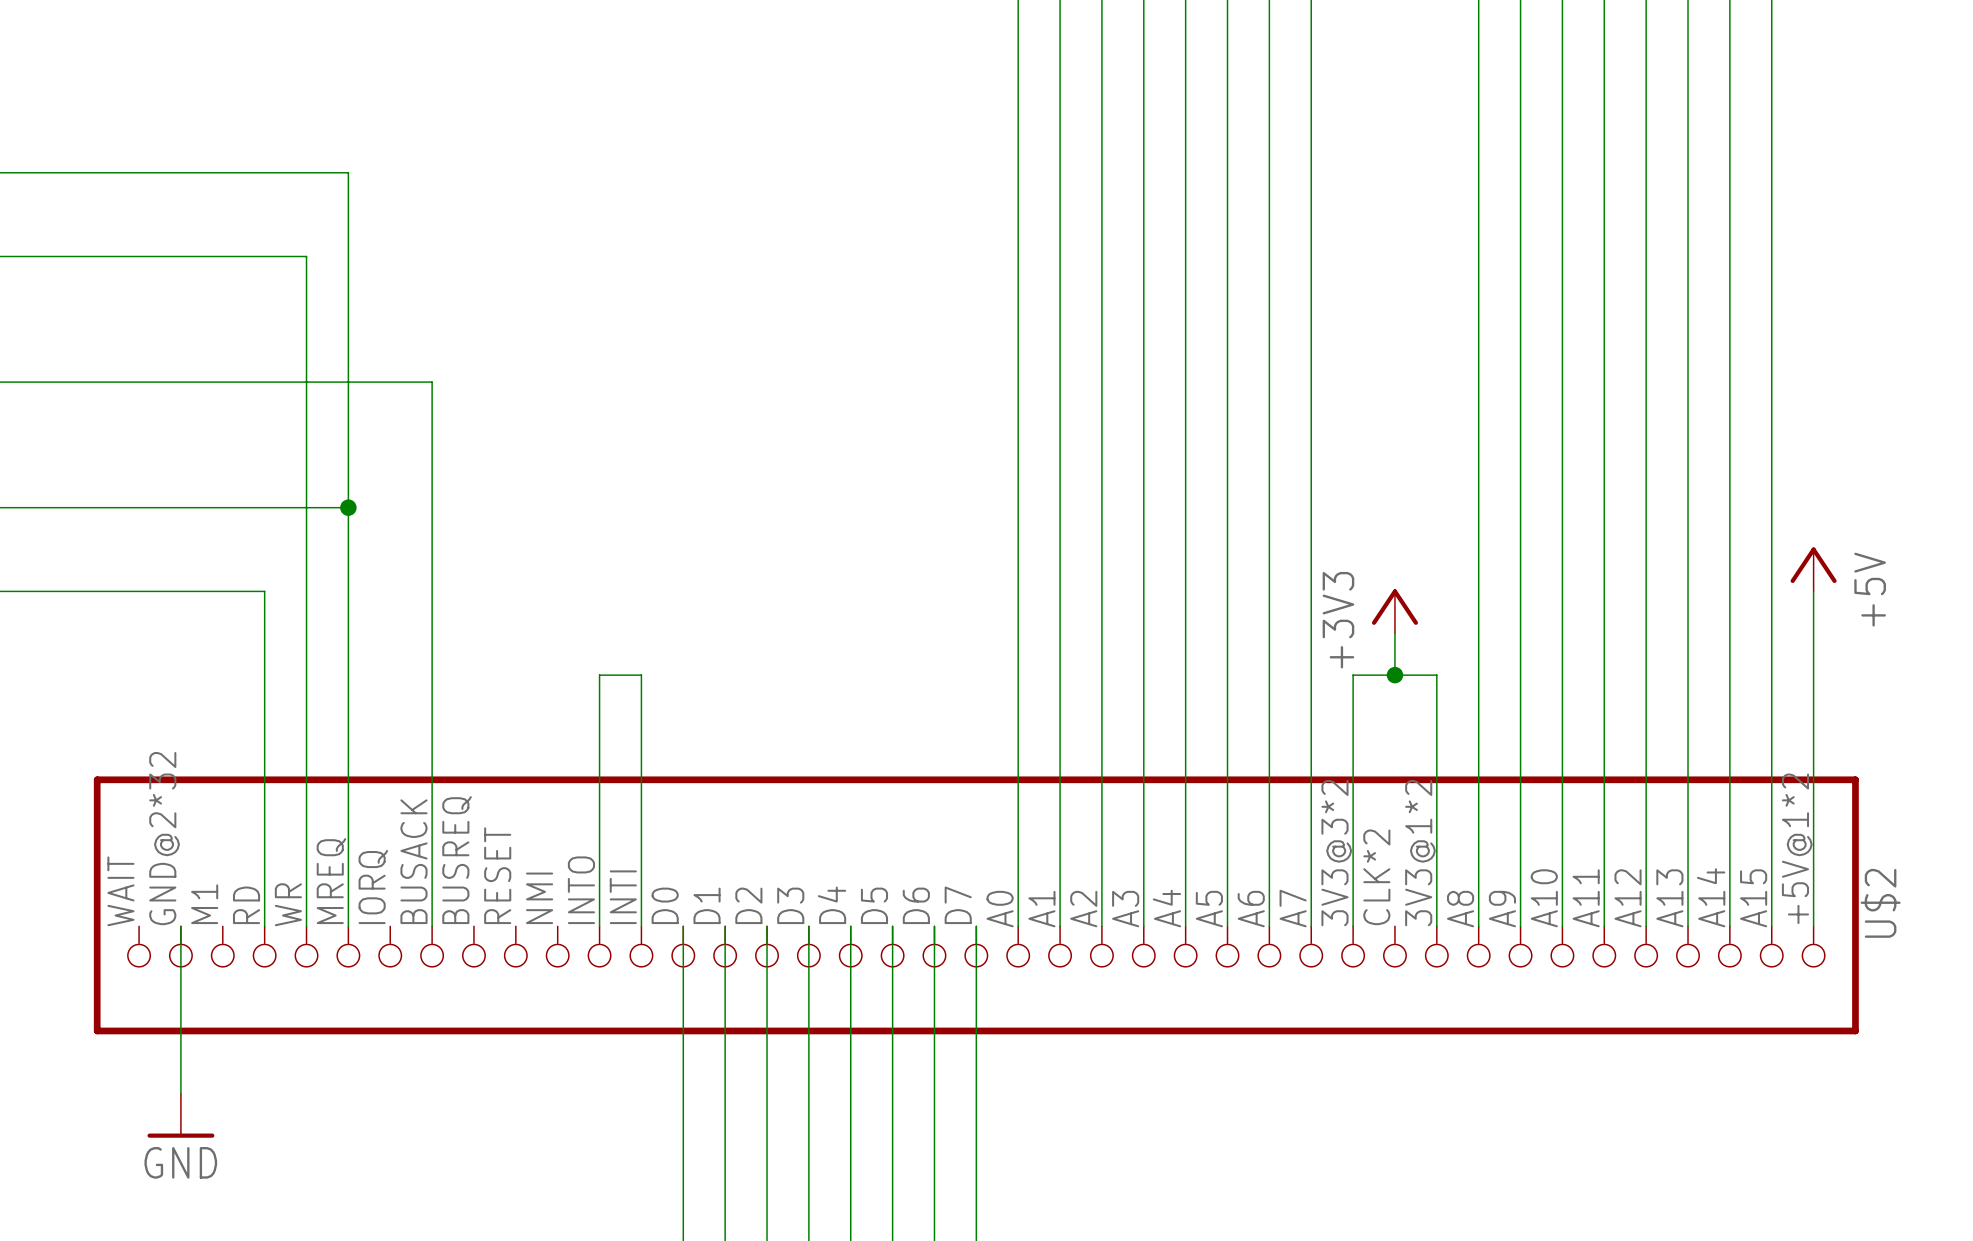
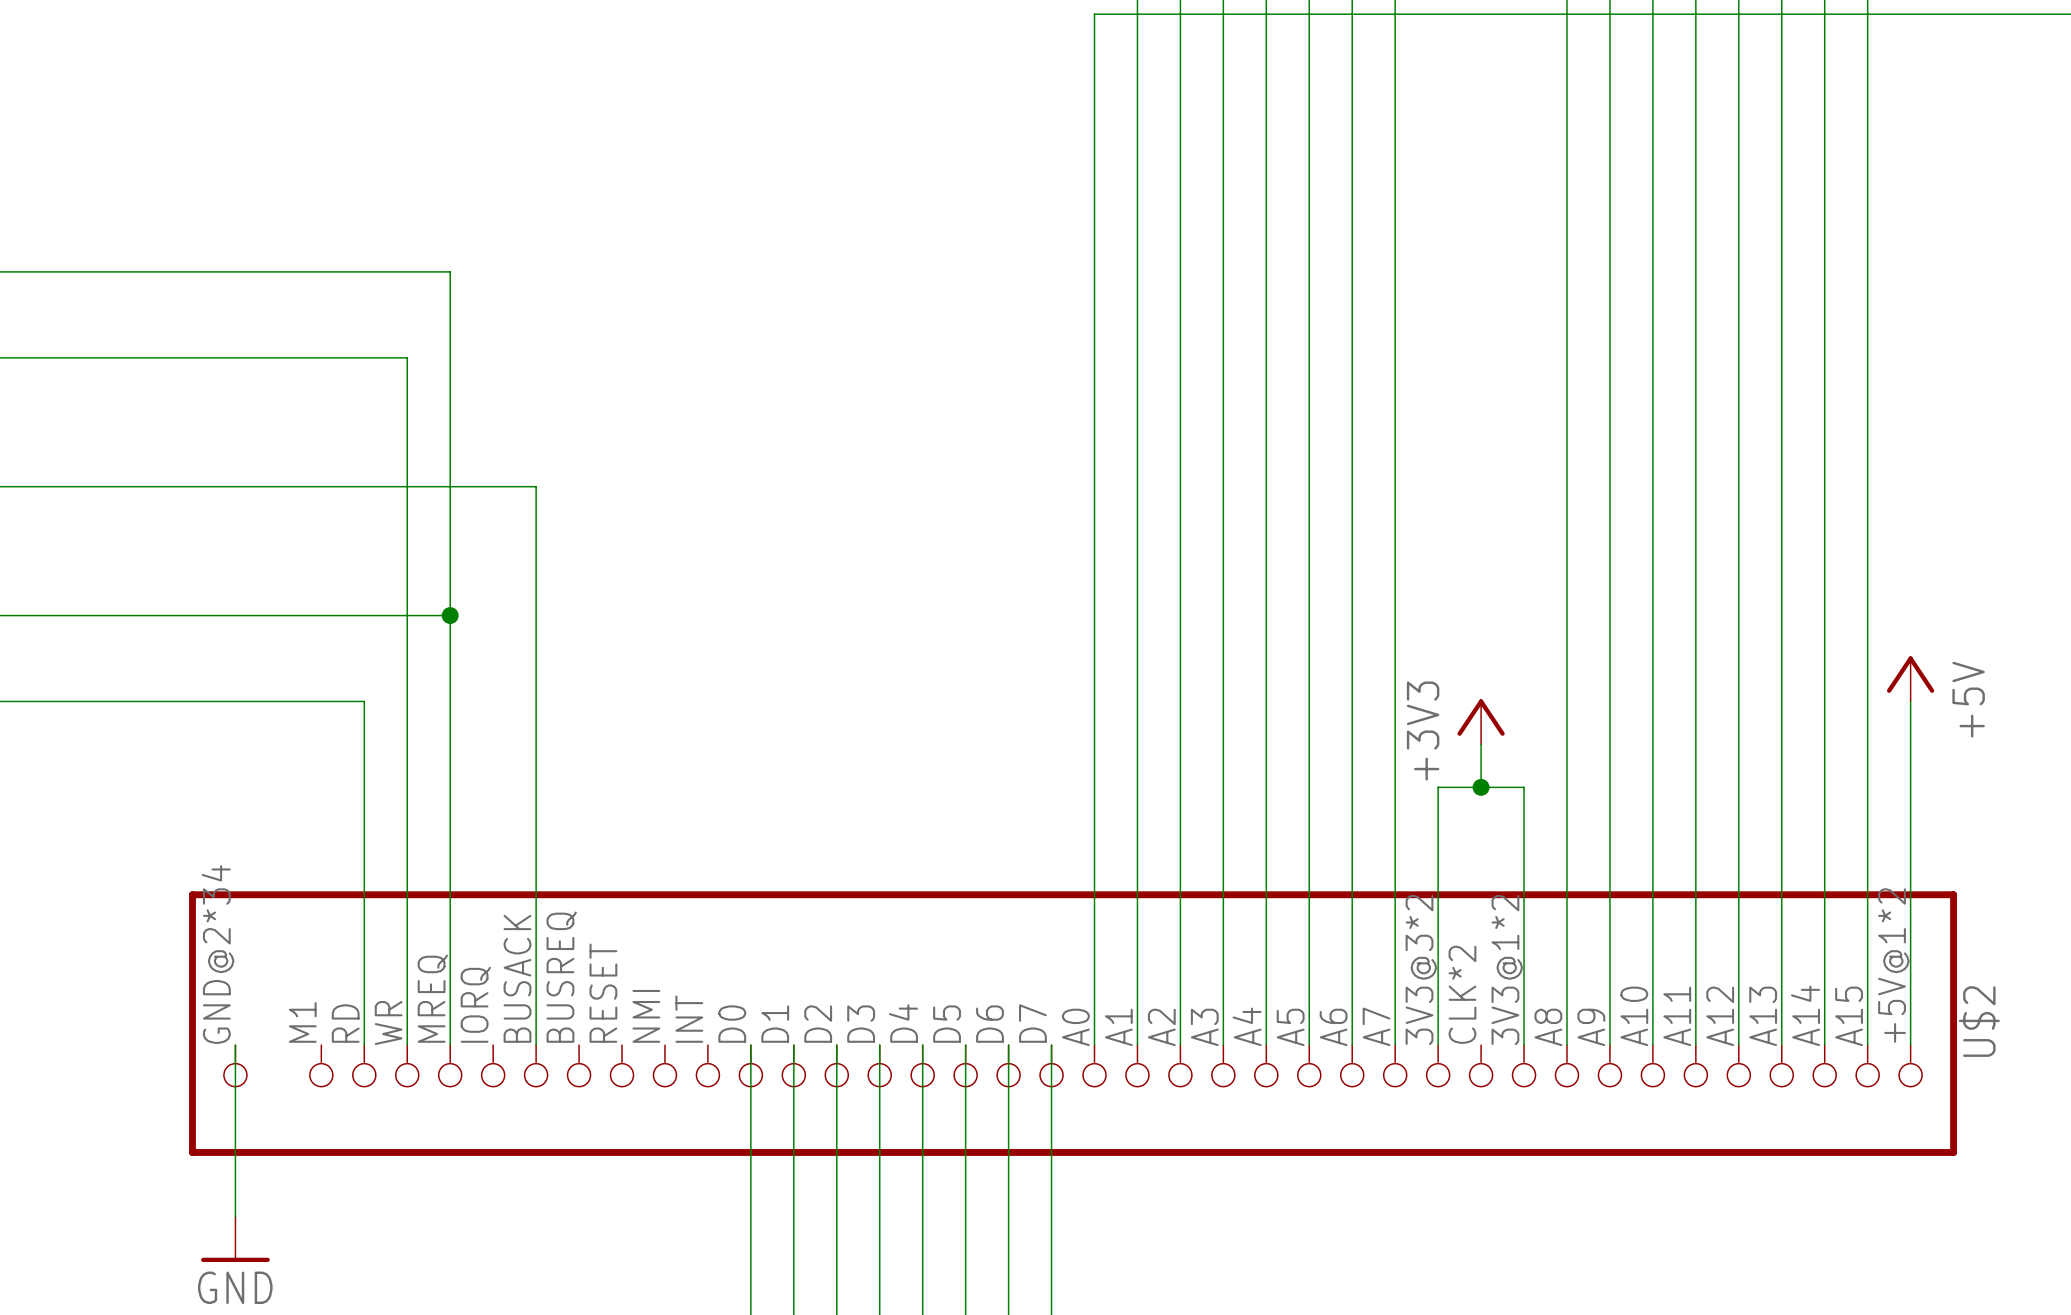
wire: (348, 172) (348, 256) -> (364, 357) (407, 357)
wire: none -> (407, 271) (450, 271) (450, 1045)
wire: (306, 256) (306, 591) -> (321, 701) (364, 701)
wire: (432, 382) (432, 926) -> (493, 486) (536, 486) (536, 1045)
wire: none -> (407, 615) (450, 615)
junction position: (348, 507) -> (450, 615)
wire: (264, 591) (264, 926) -> none
U$2 symbol: [93, 776, 1859, 1035] -> [189, 891, 1958, 1156]
wire: (599, 926) (599, 675) (641, 675) (641, 926) -> none

